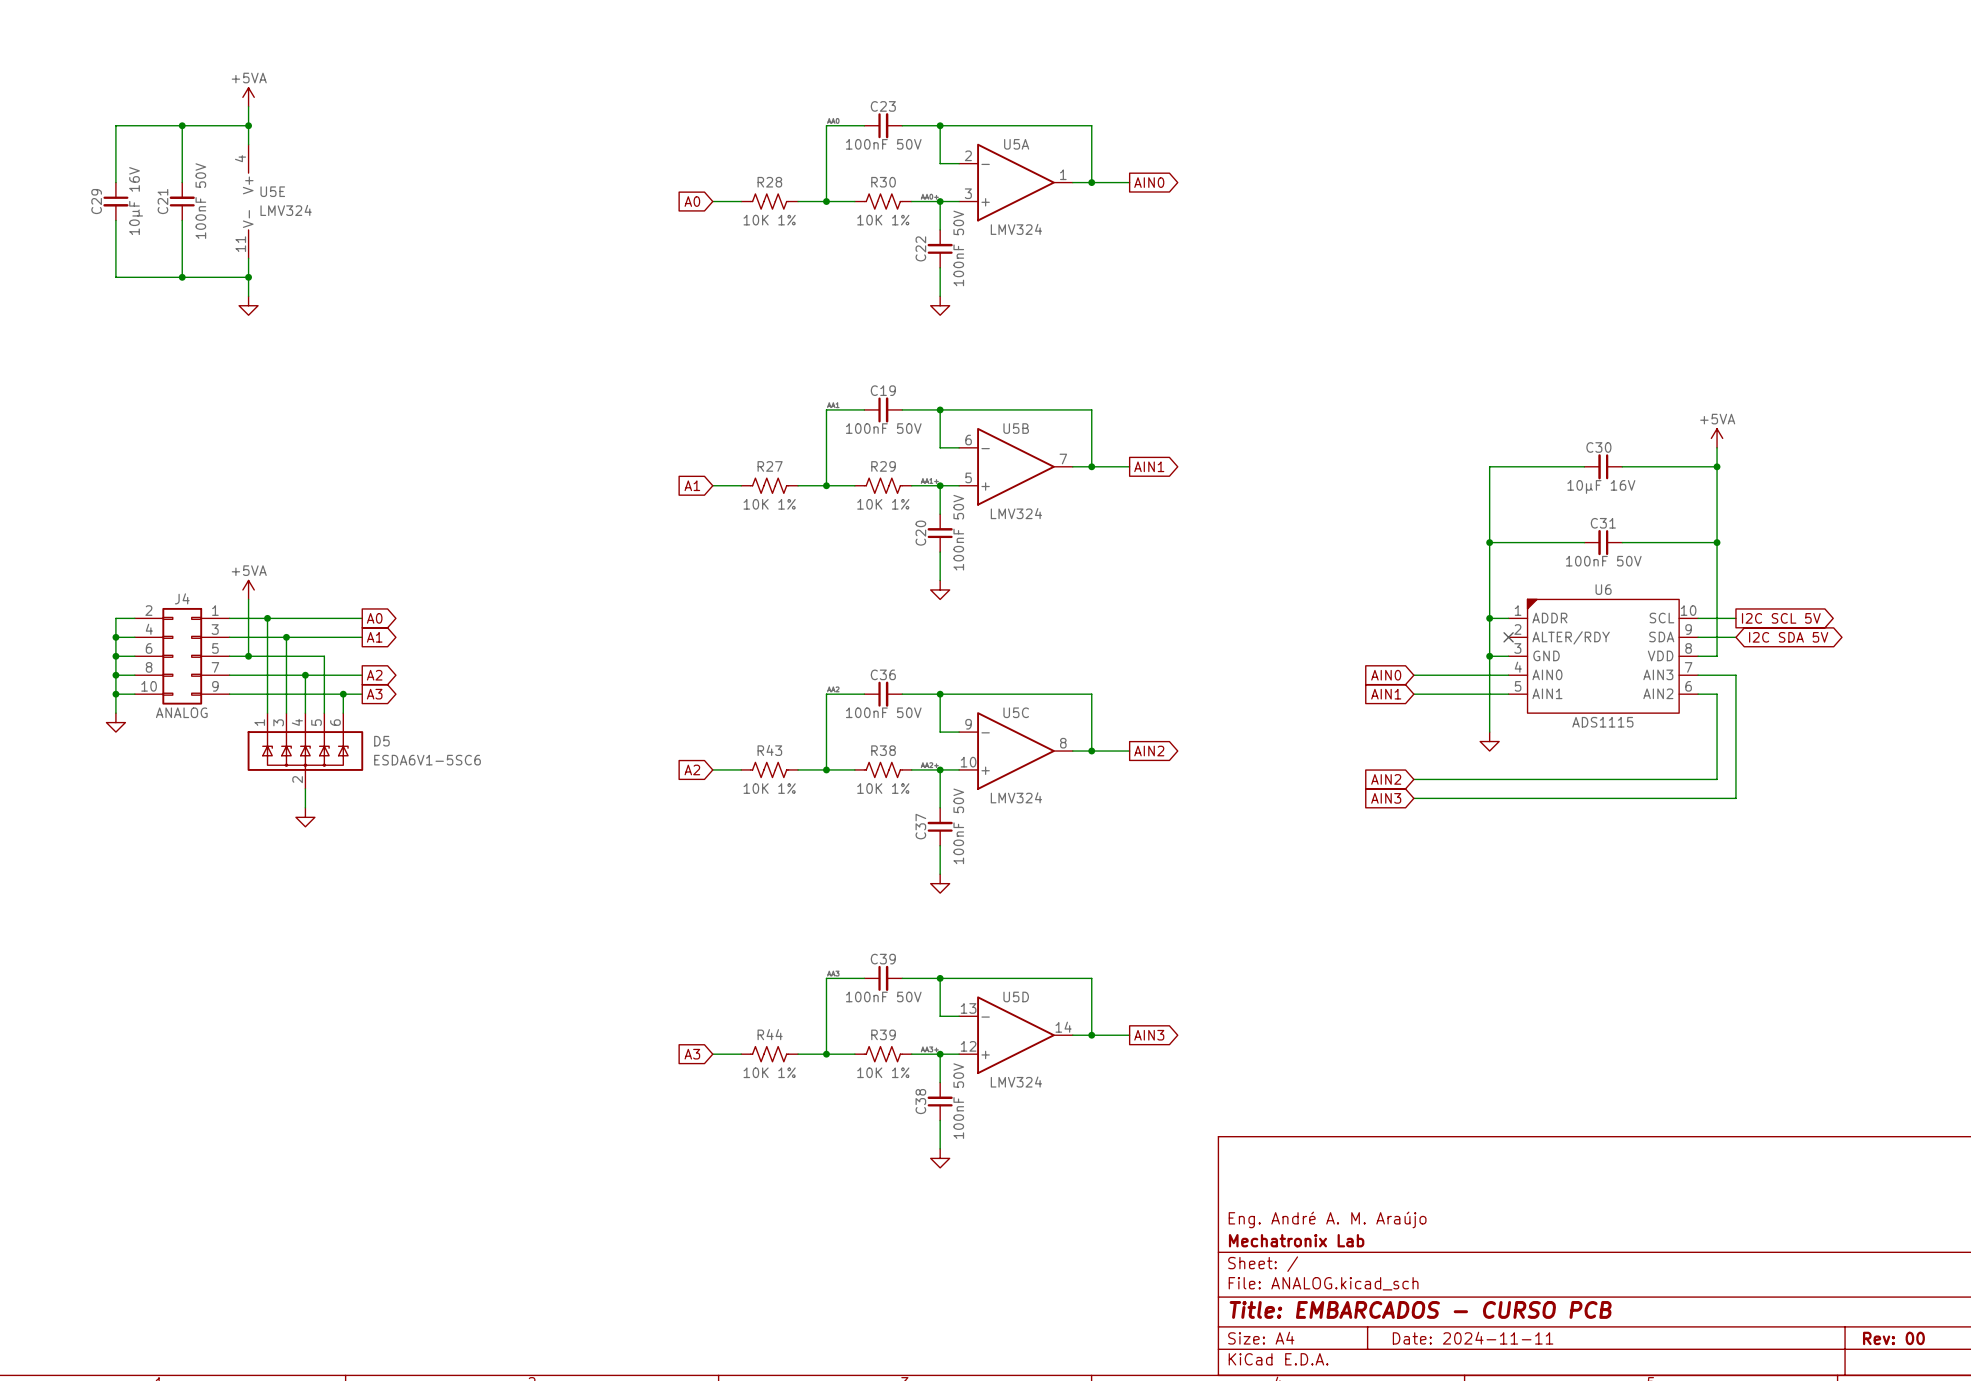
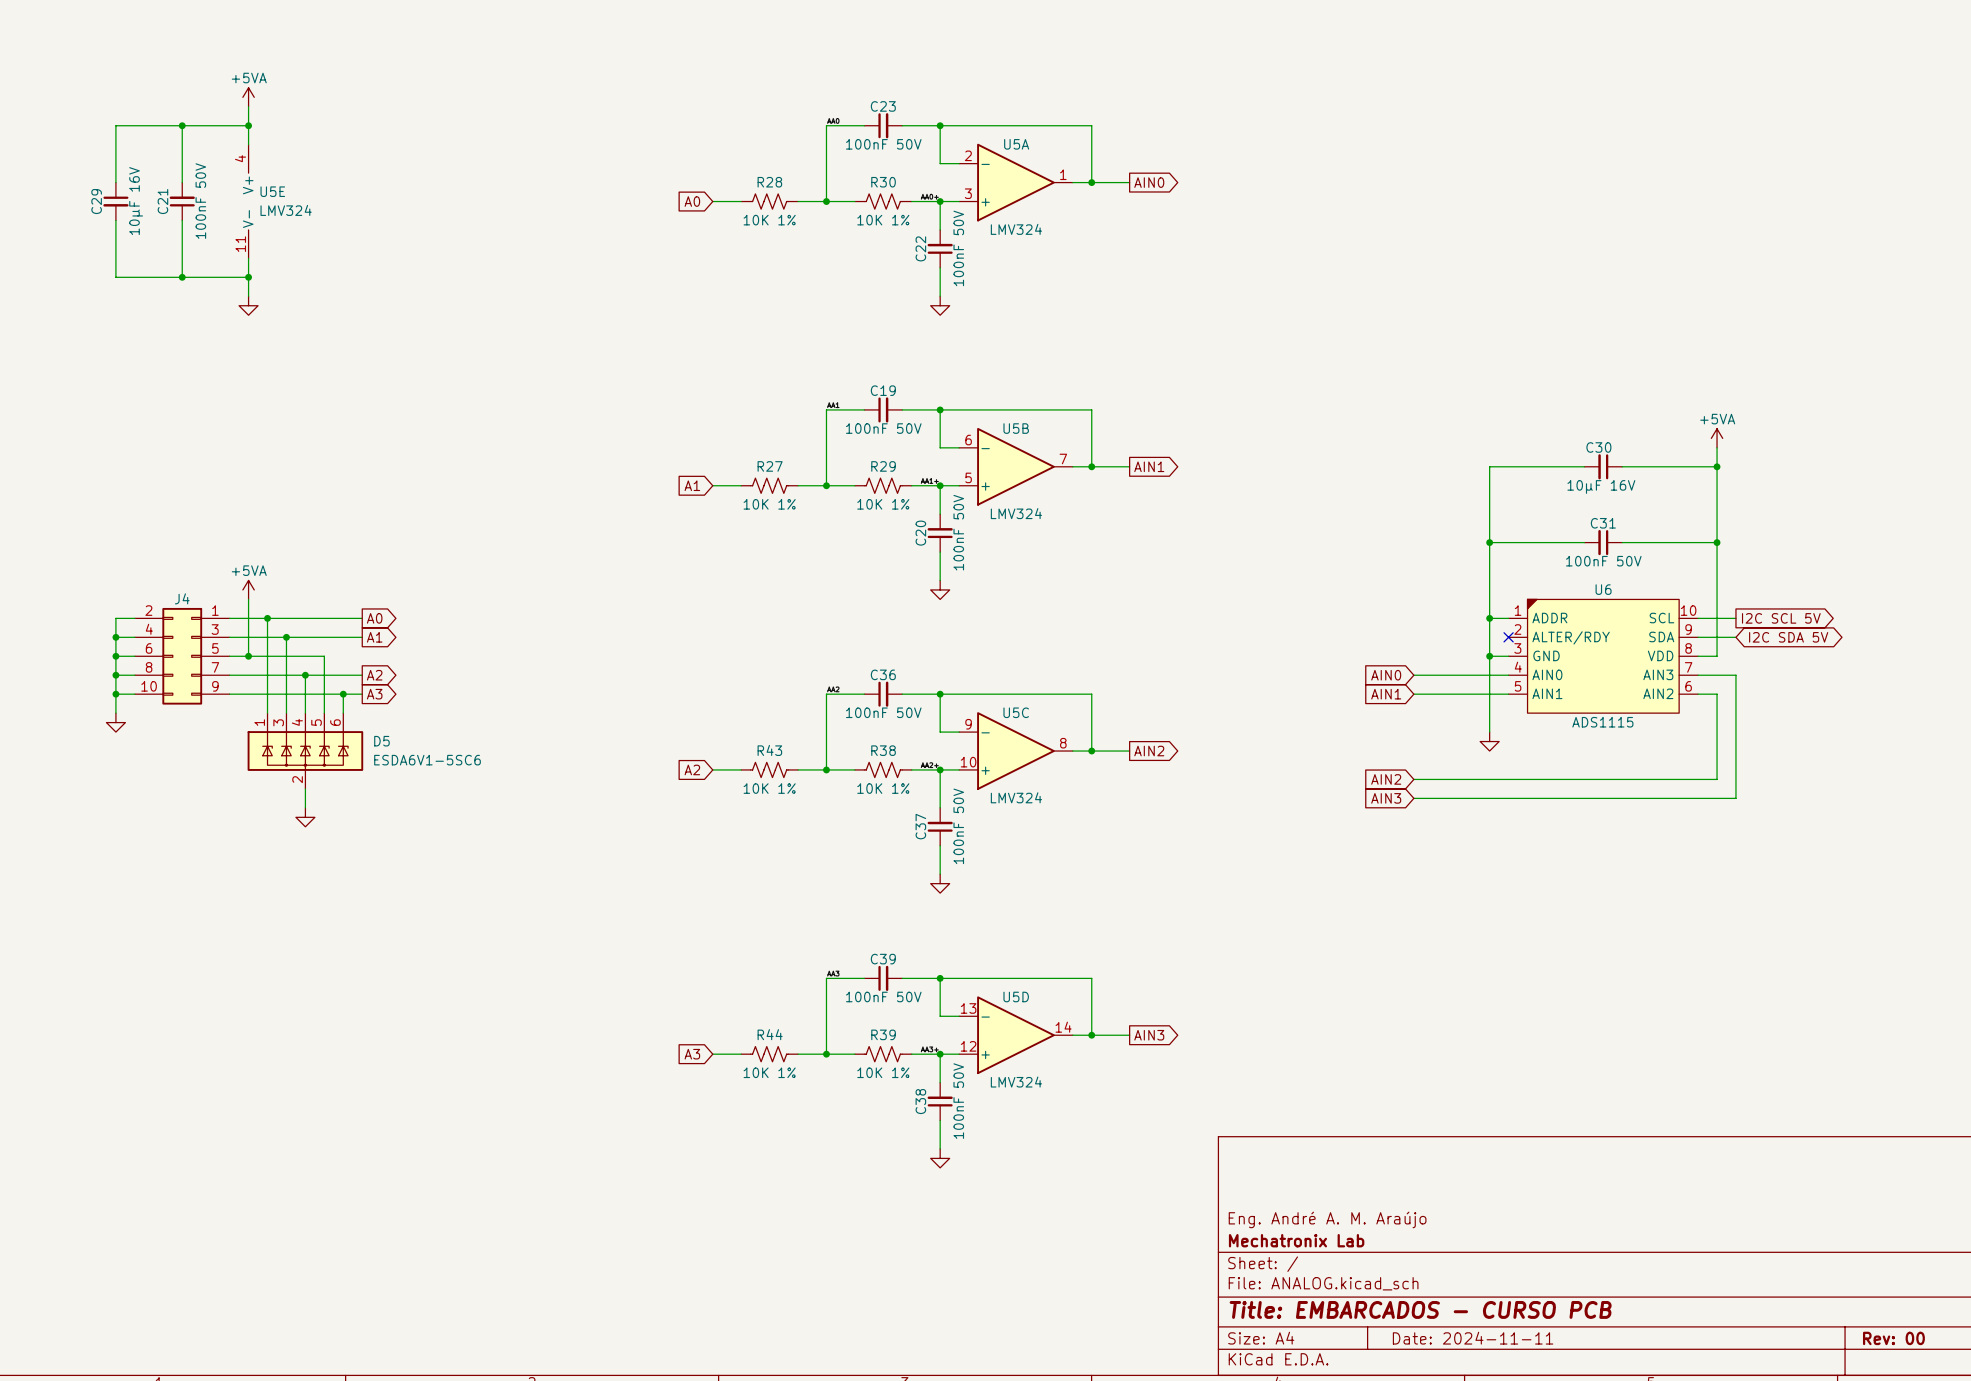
J4 value: ANALOG (181, 712) -> none

